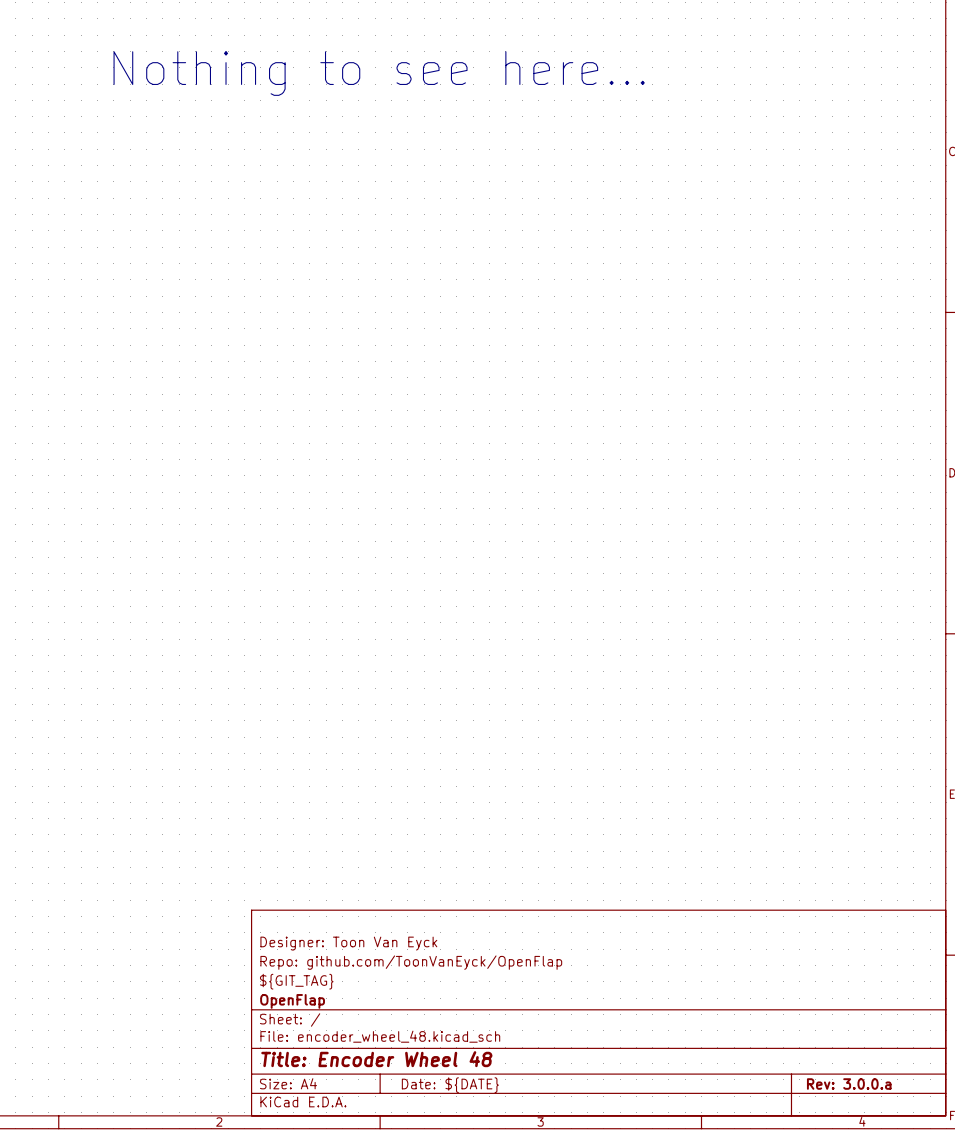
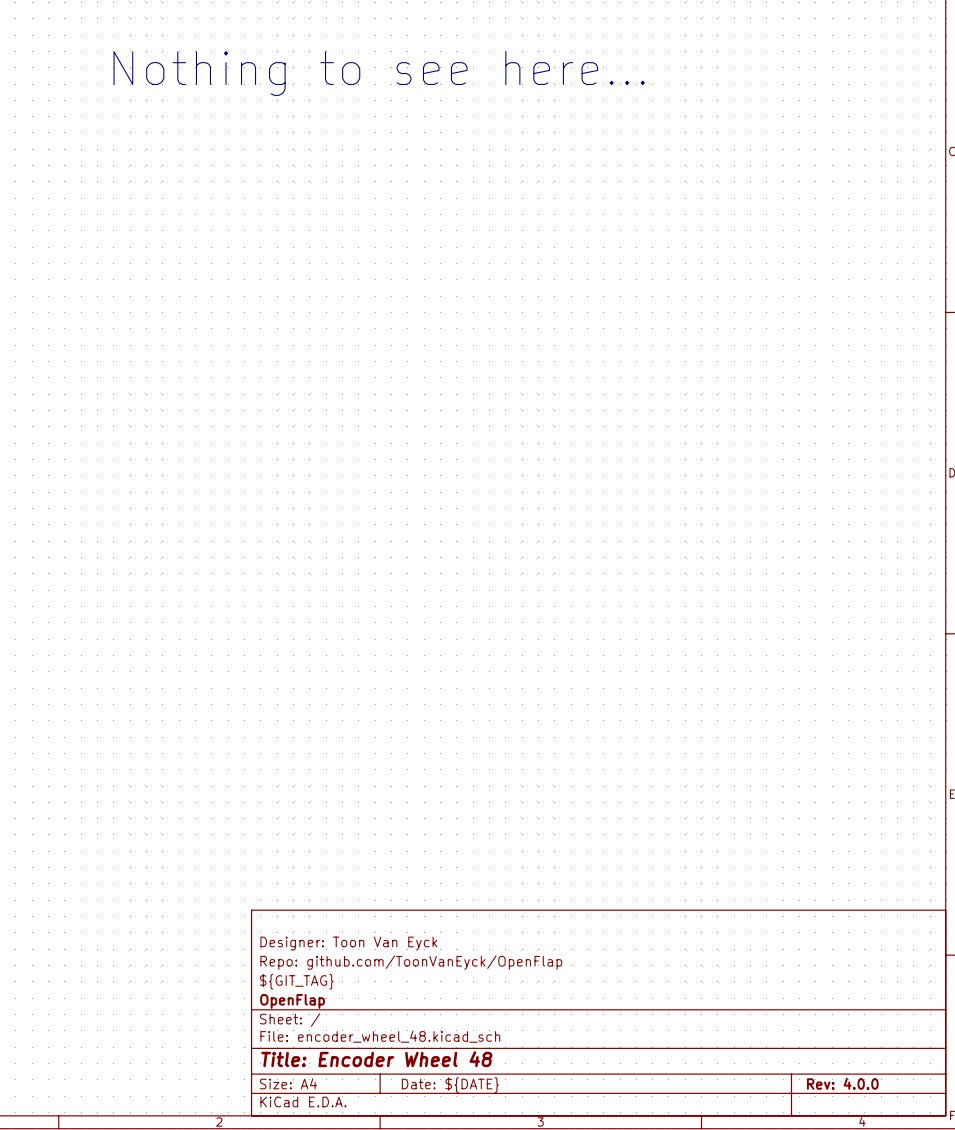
title block: Rev: 3.0.0.a (849, 1084) -> Rev: 4.0.0 (842, 1083)

